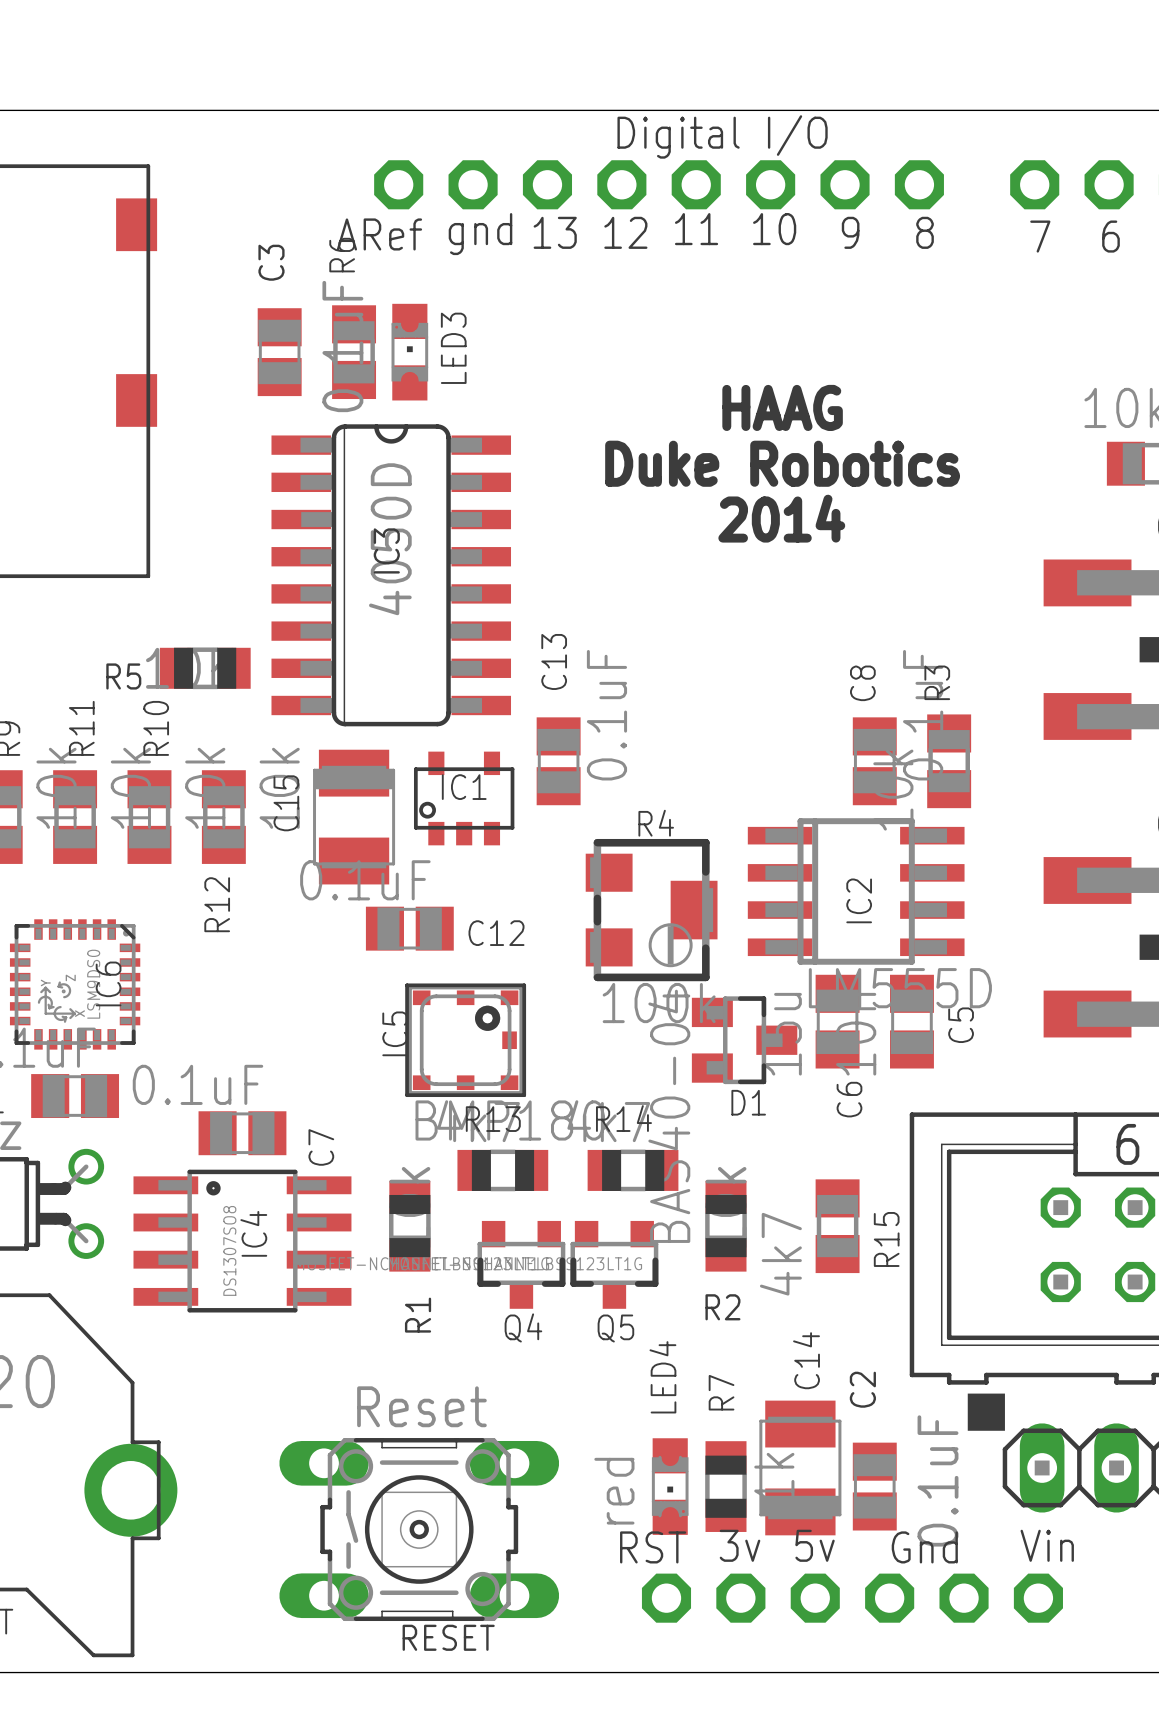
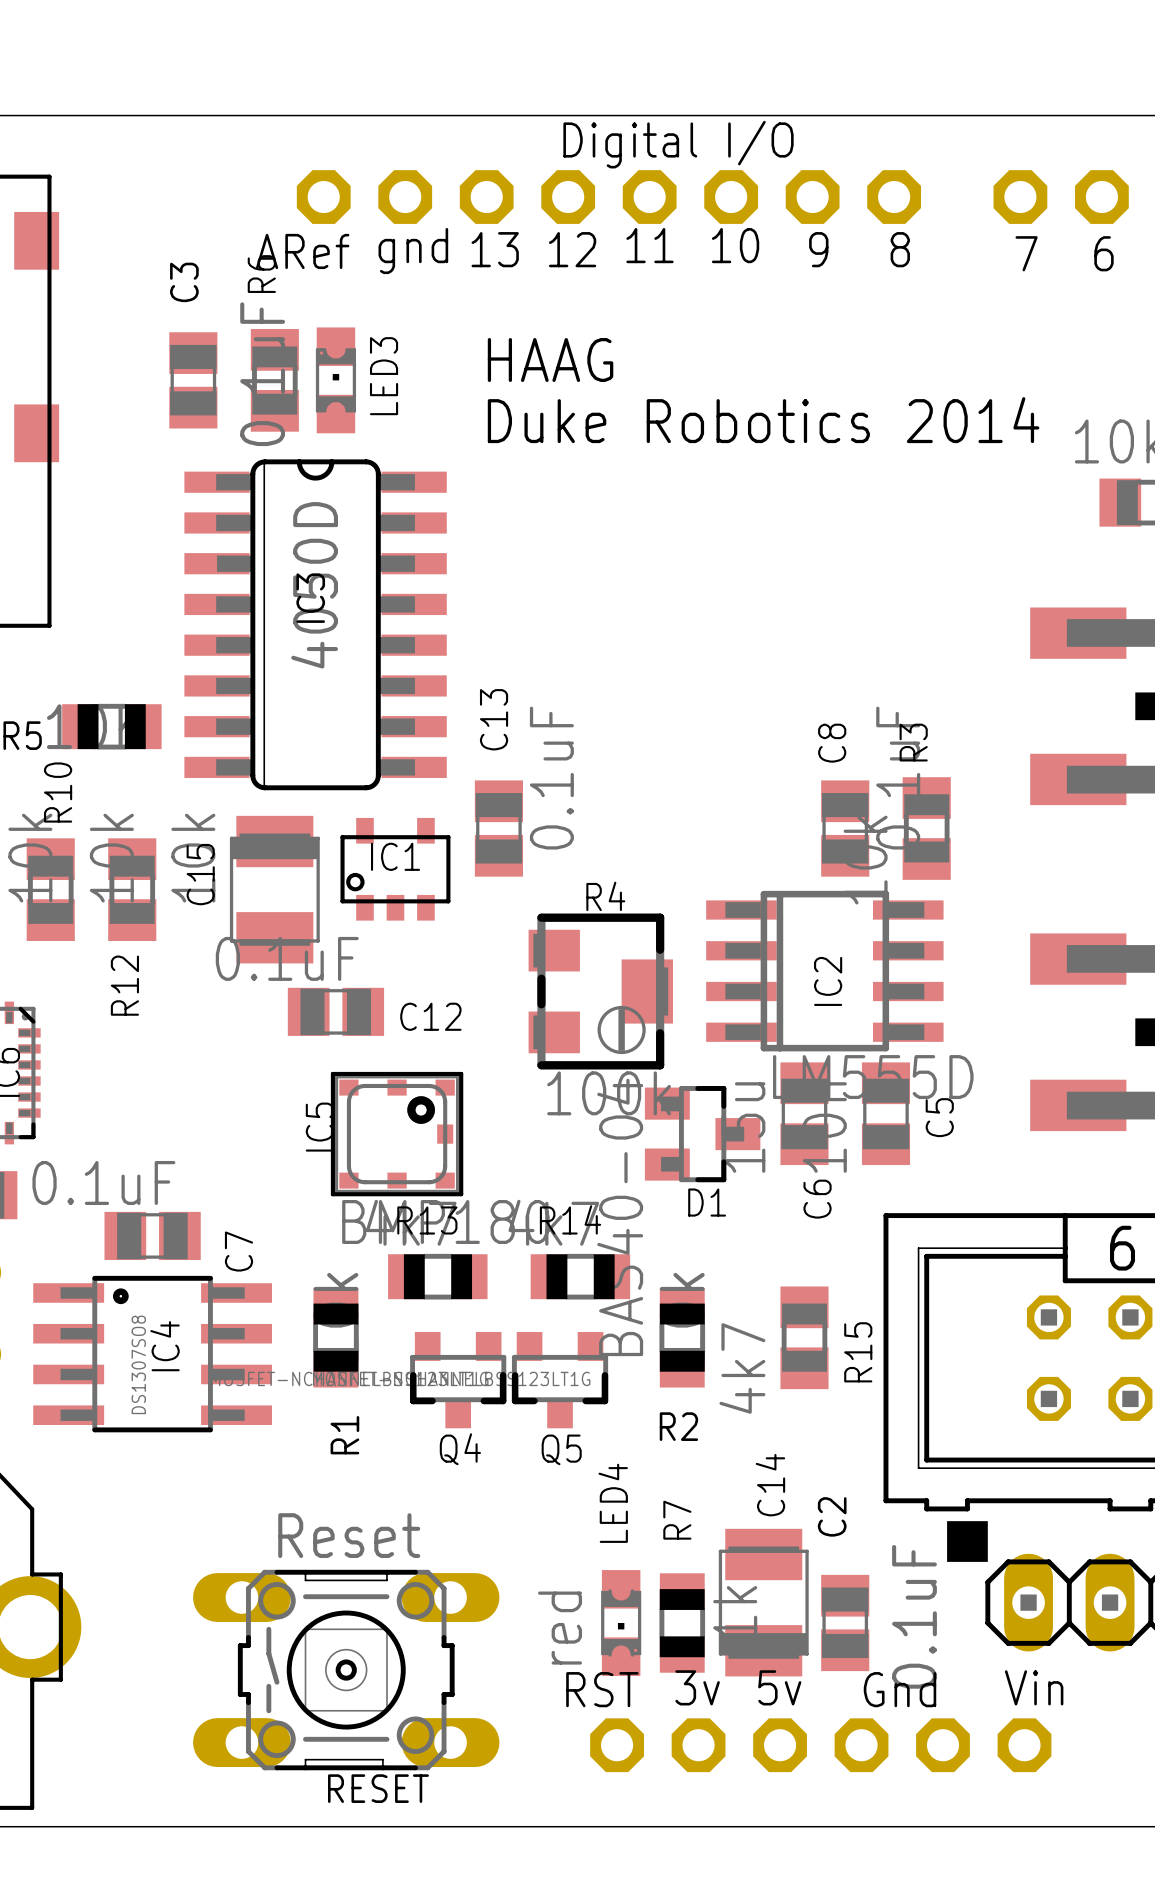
text position: HAAG (782, 407) -> HAAG (550, 360)
text: Duke Robotics (782, 463) -> Duke Robotics 2014 (763, 420)
text: 2014 (781, 518) -> none

